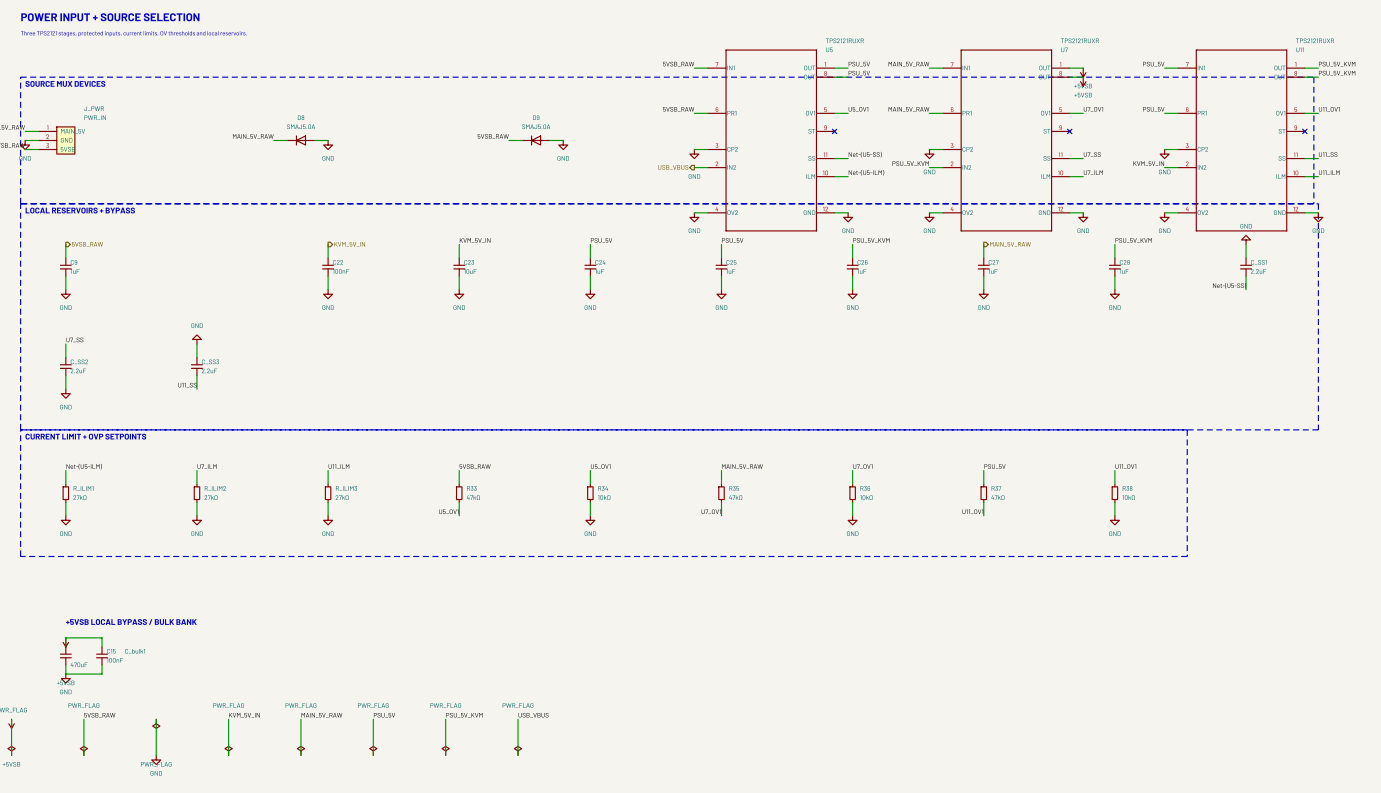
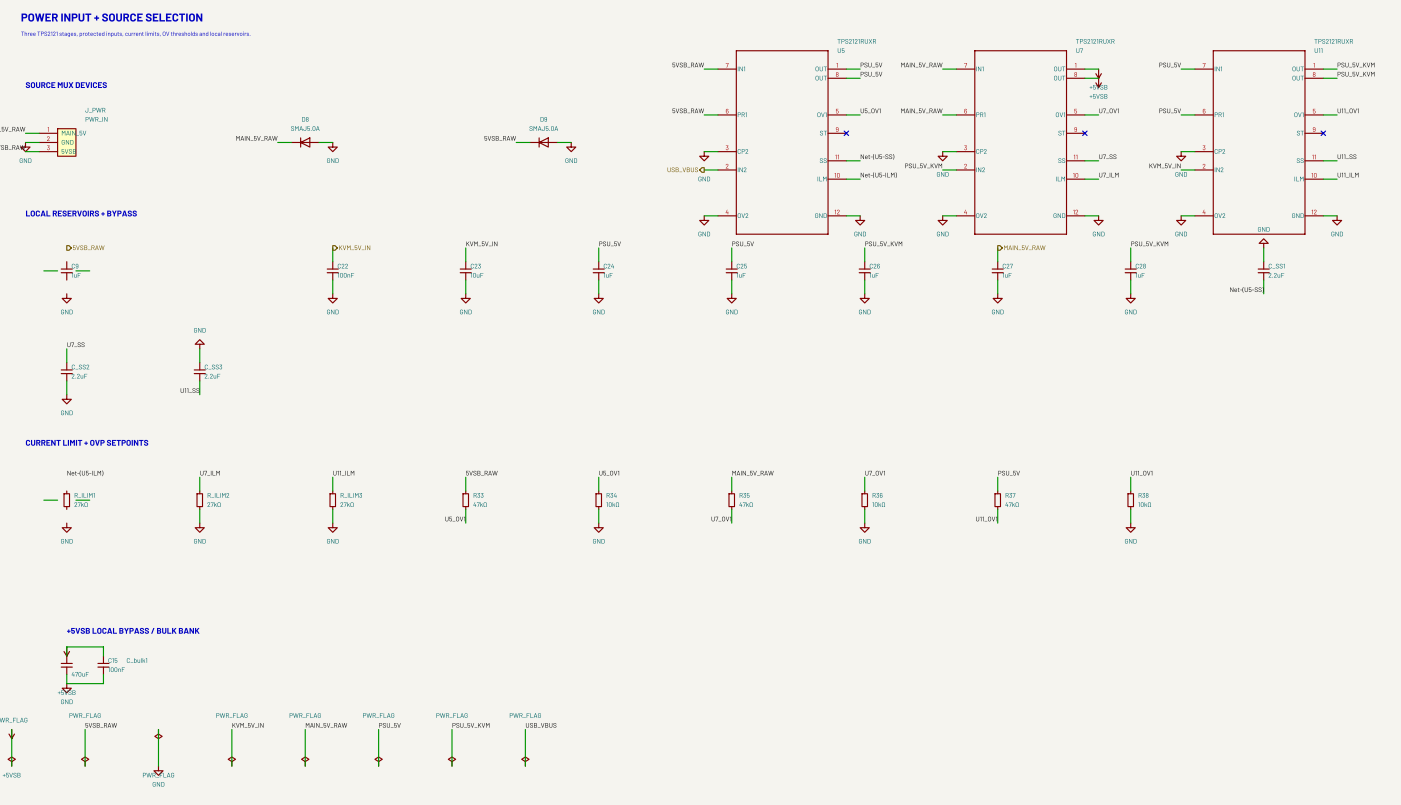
line: (20, 203) (1318, 203) (1318, 429) (20, 429) -> none
line: (1313, 203) (1313, 77) (20, 77) (20, 556) (1187, 556) (1187, 429) -> none
wire: (65, 244) (65, 258) -> none
wire: none -> (43, 270) (57, 270)
wire: none -> (75, 270) (89, 270)
wire: (65, 276) (65, 289) -> none
wire: (65, 470) (65, 484) -> none
wire: none -> (43, 500) (57, 500)
wire: none -> (75, 500) (89, 500)
wire: (65, 502) (65, 515) -> none

